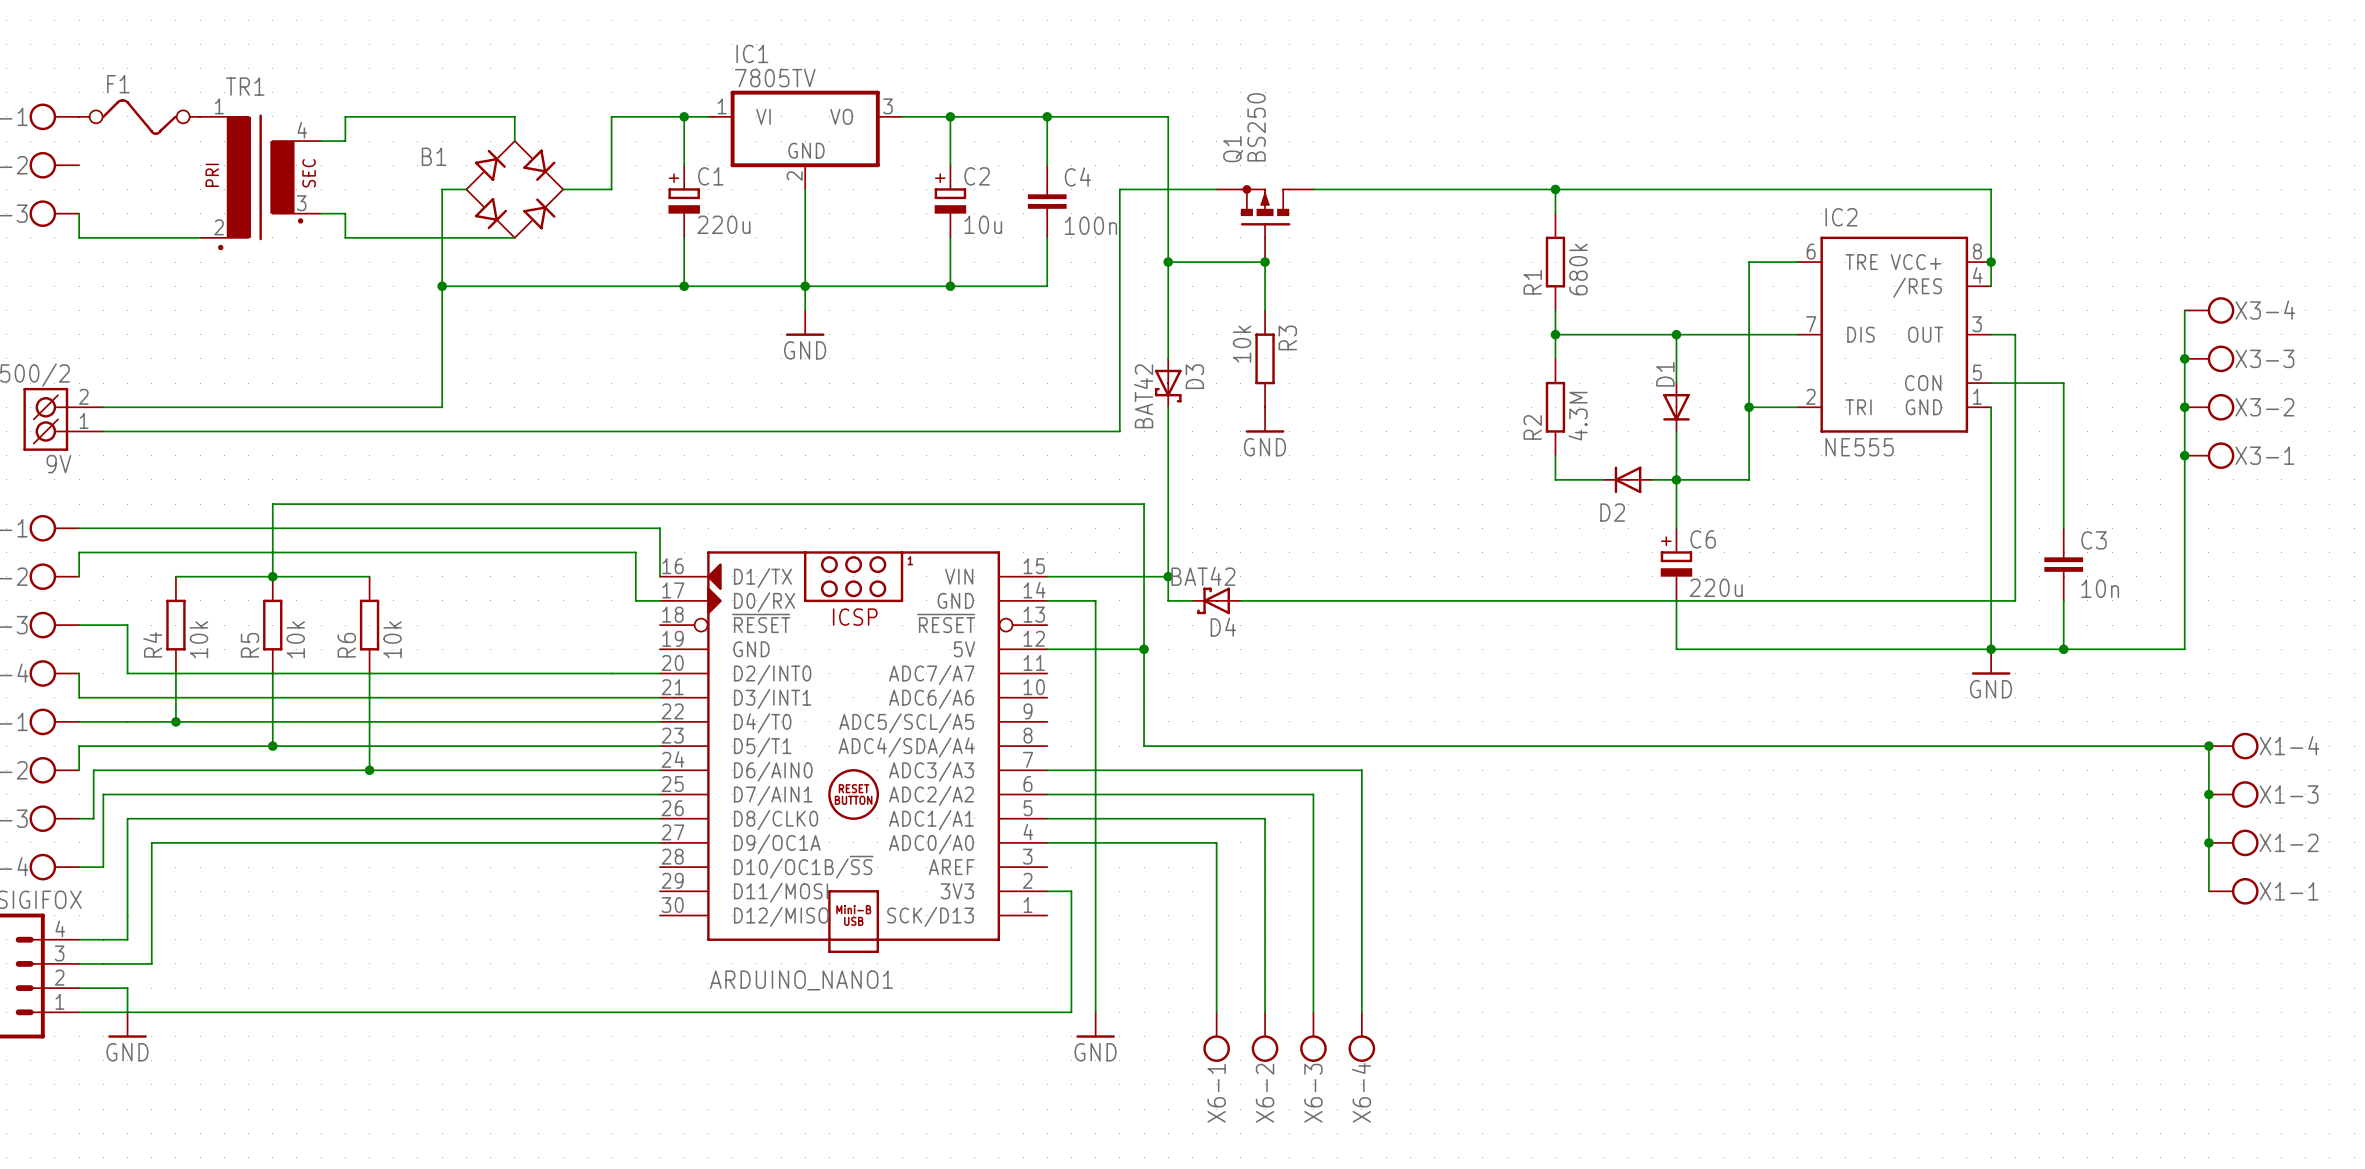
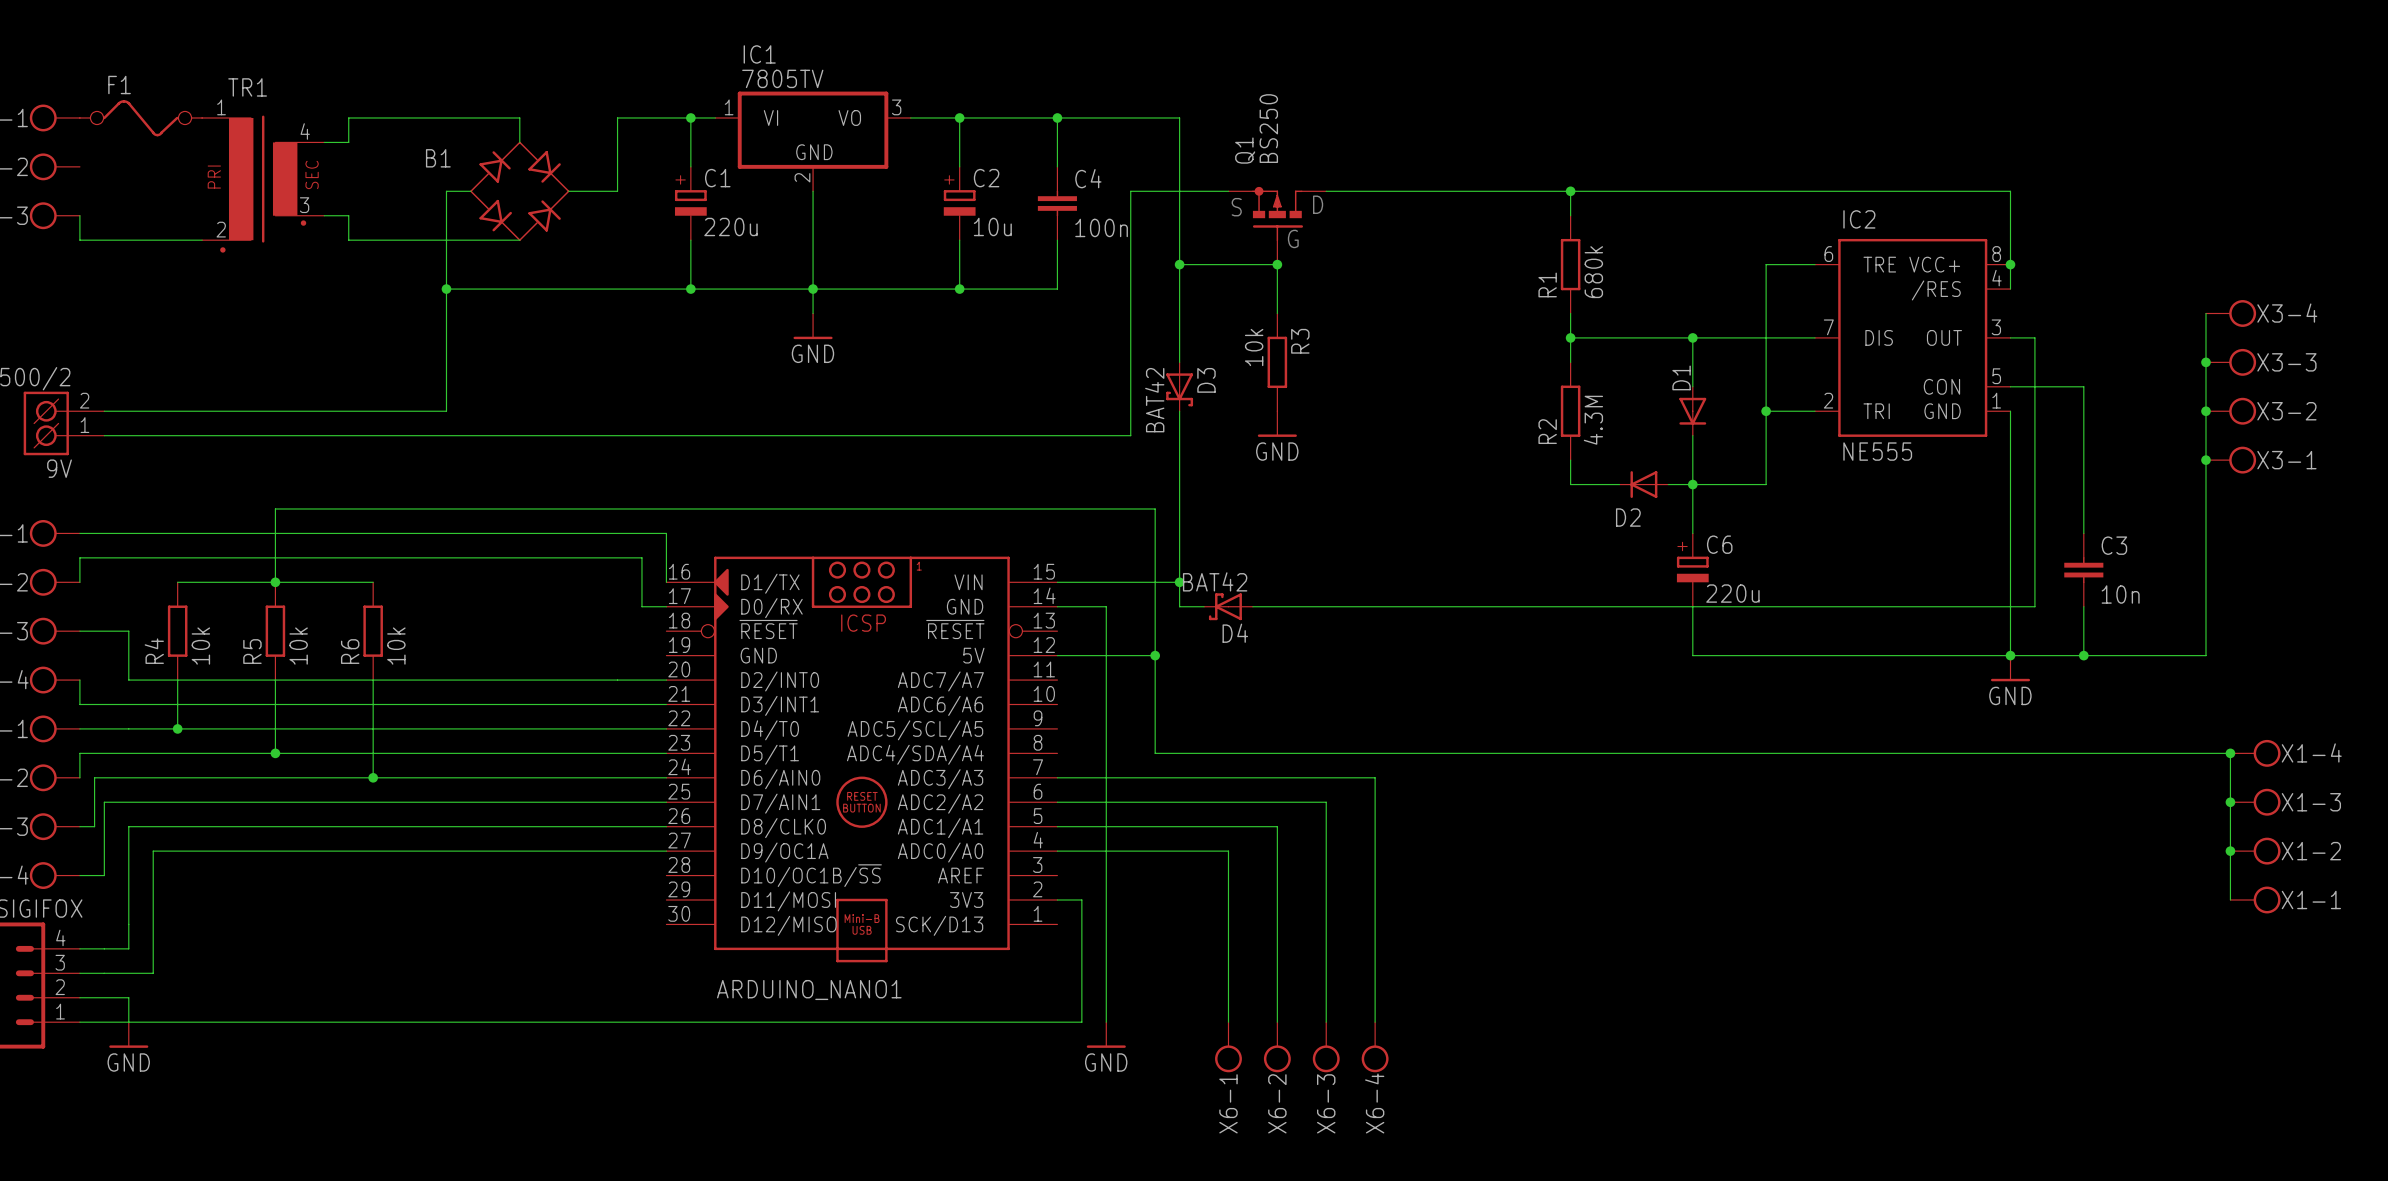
text: none -> D (1318, 204)
text: none -> S (1236, 207)
text: none -> G (1293, 238)

